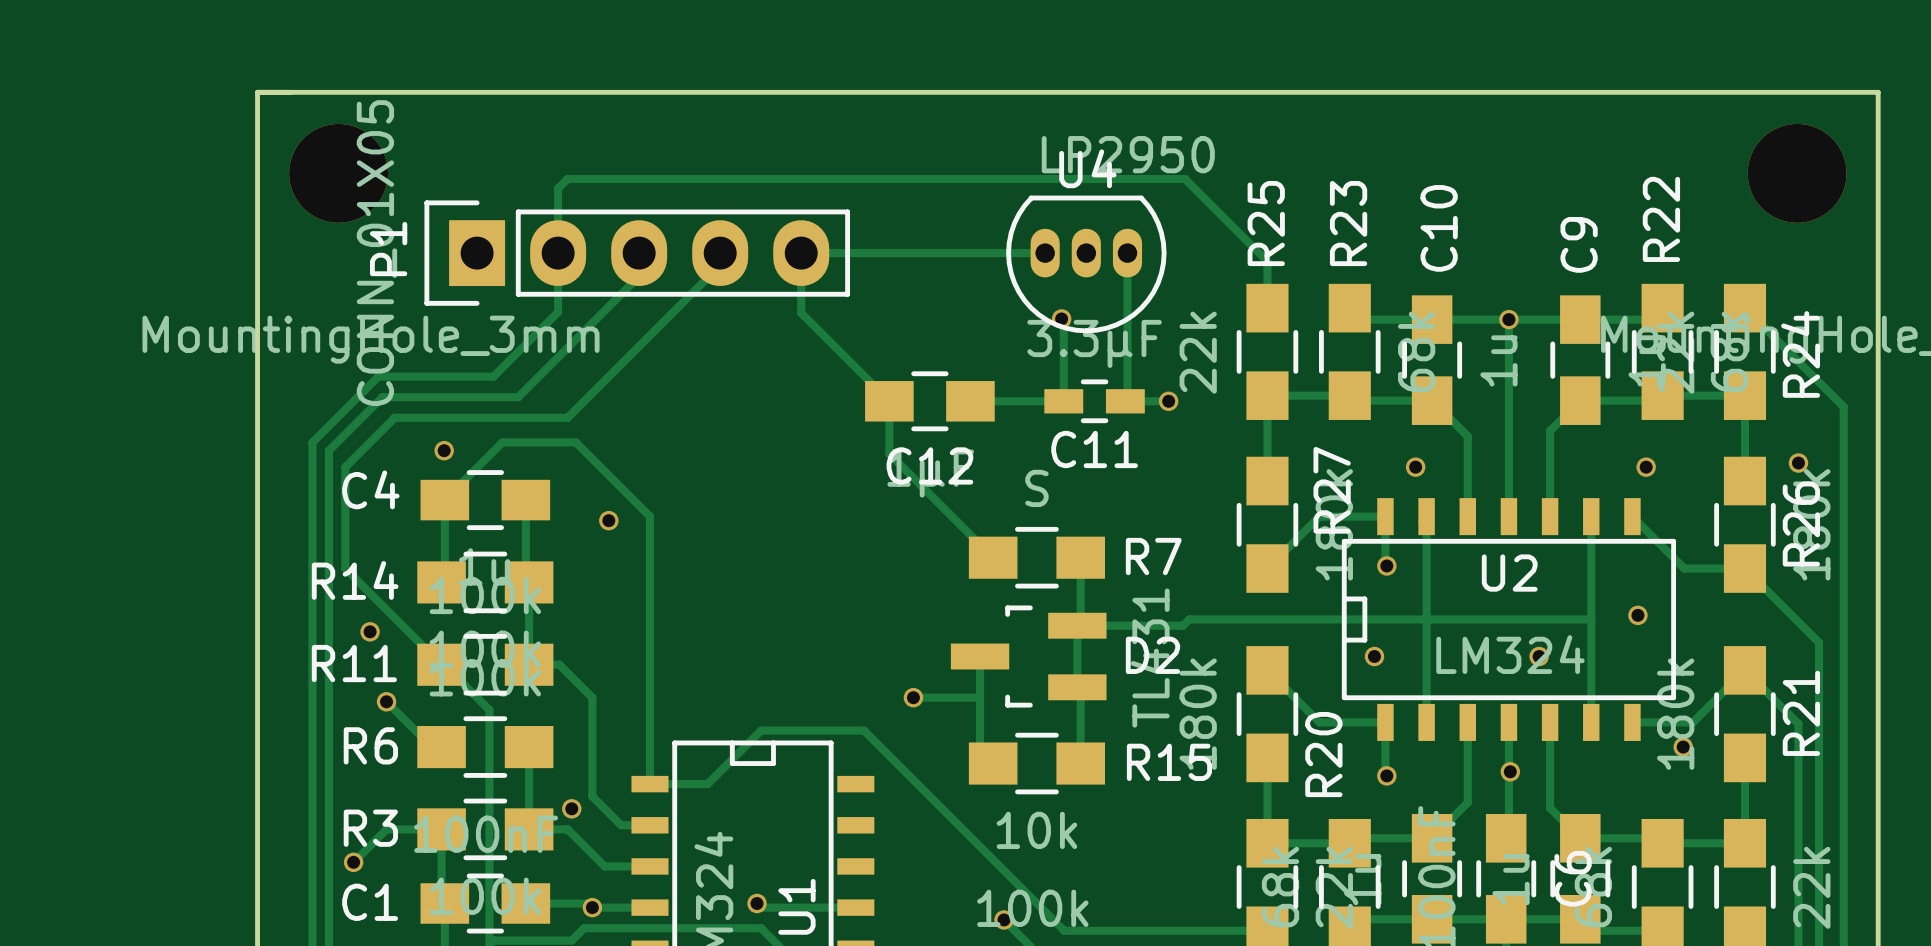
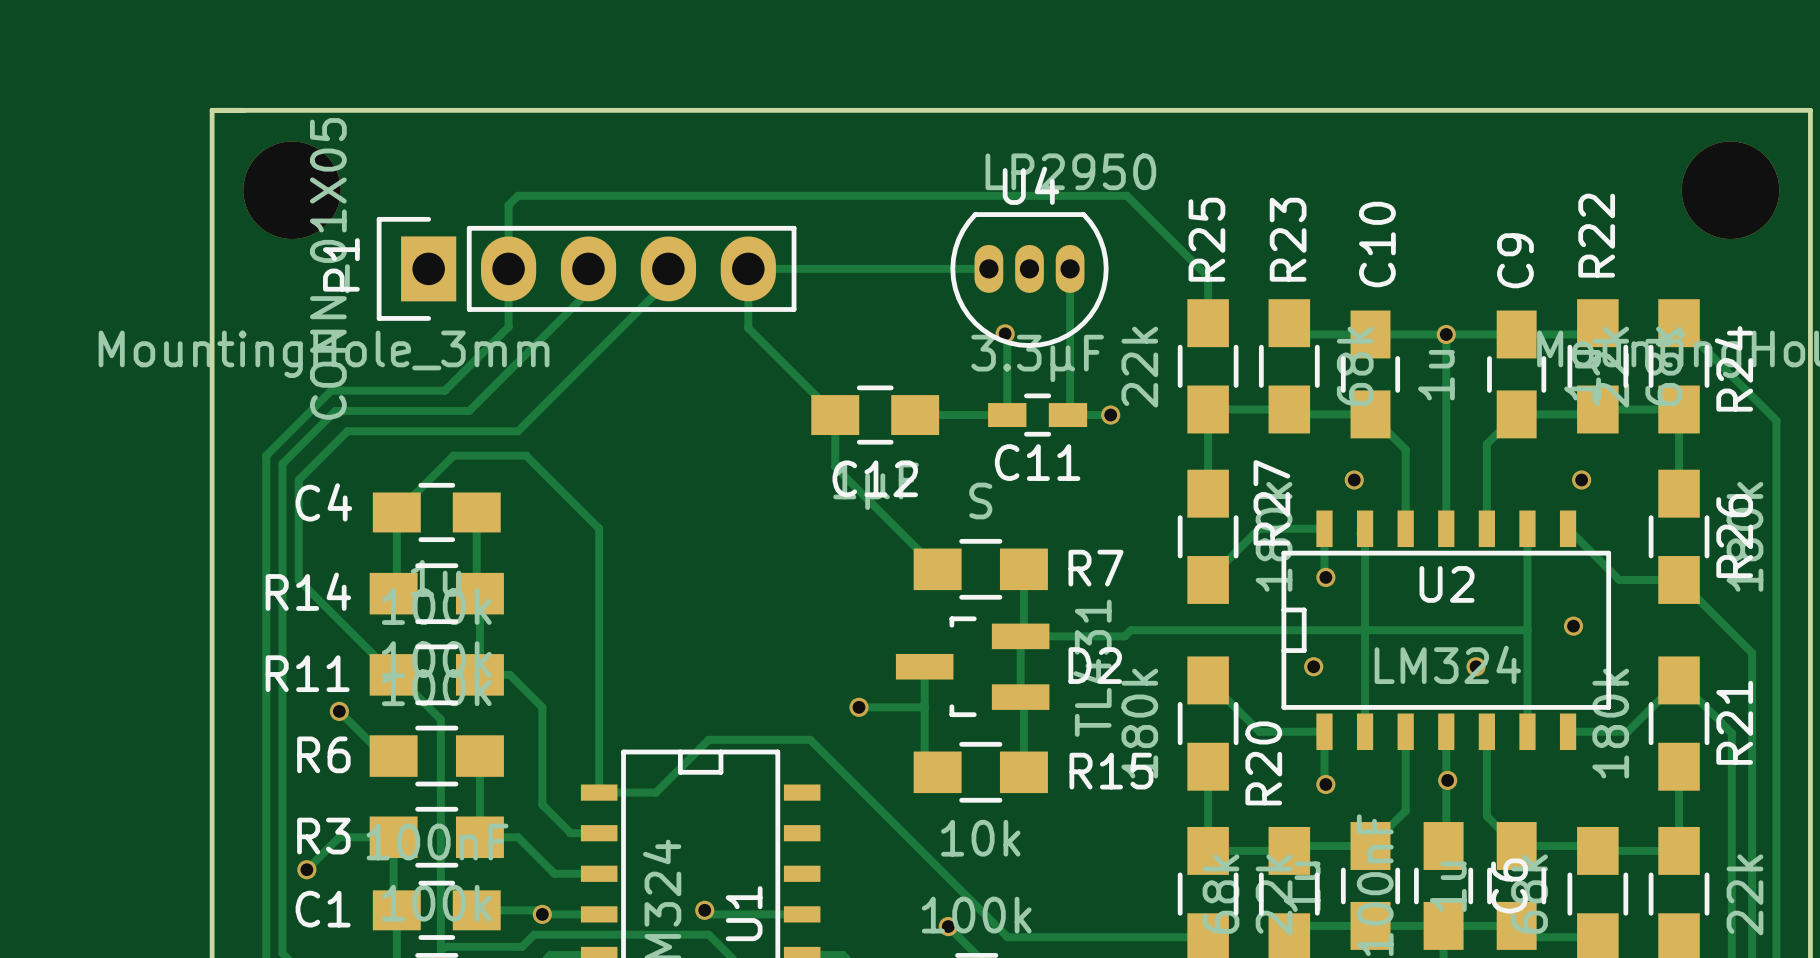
via: (444, 450) -> none
via: (1798, 463) -> none
via: (608, 520) -> none
via: (370, 631) -> none
via: (1683, 747) -> none
via: (571, 808) -> none

